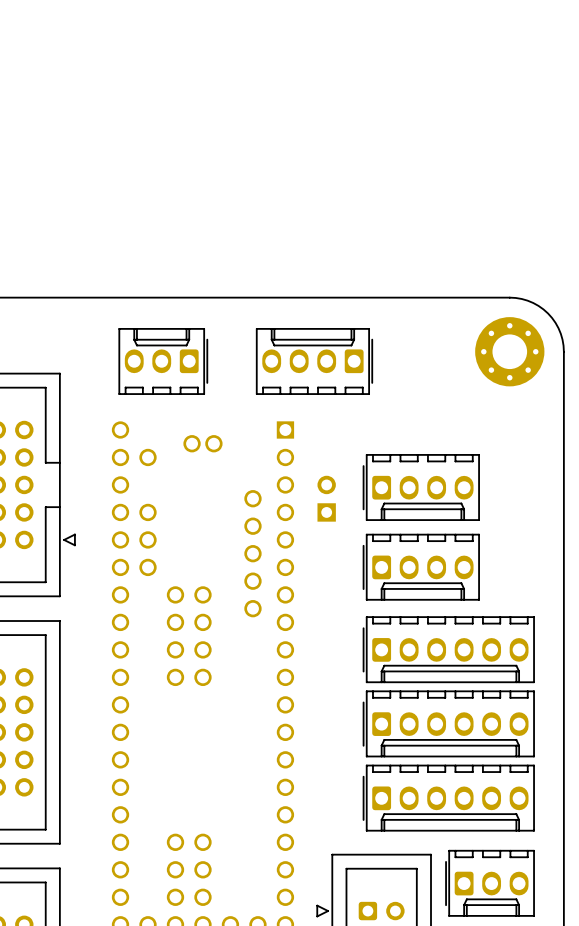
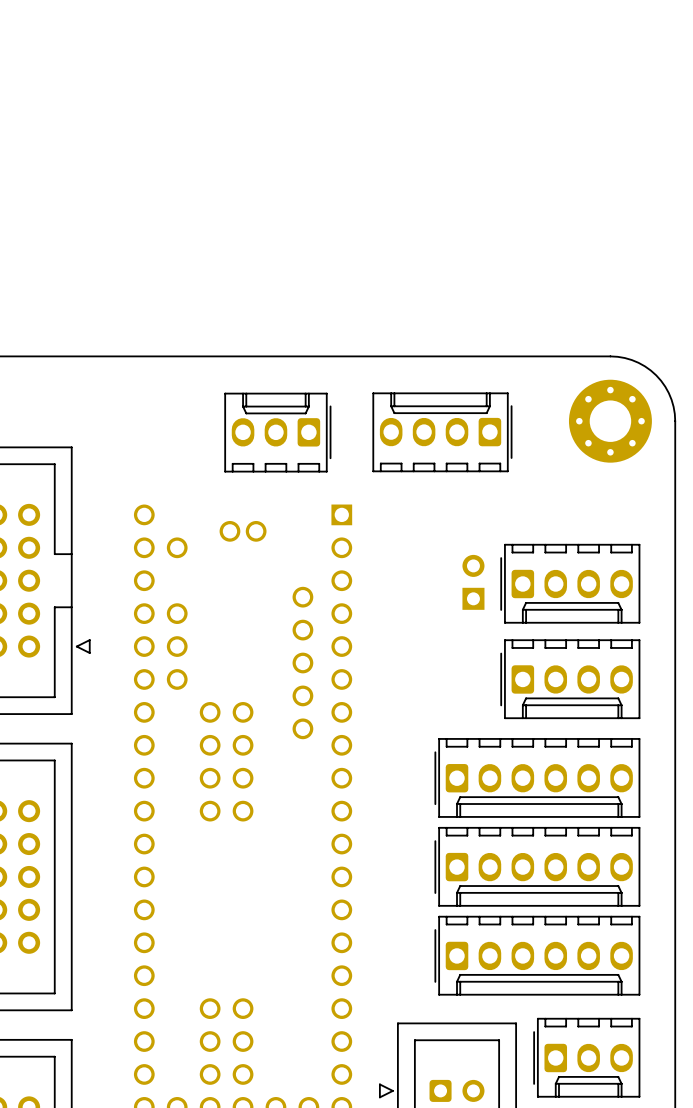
part position: (163, 361) -> (277, 432)
part position: (314, 361) -> (442, 432)
part: (421, 487) -> none
part: none -> (570, 583)
part position: (326, 498) -> (473, 582)
part: (421, 567) -> none
part: none -> (570, 679)

